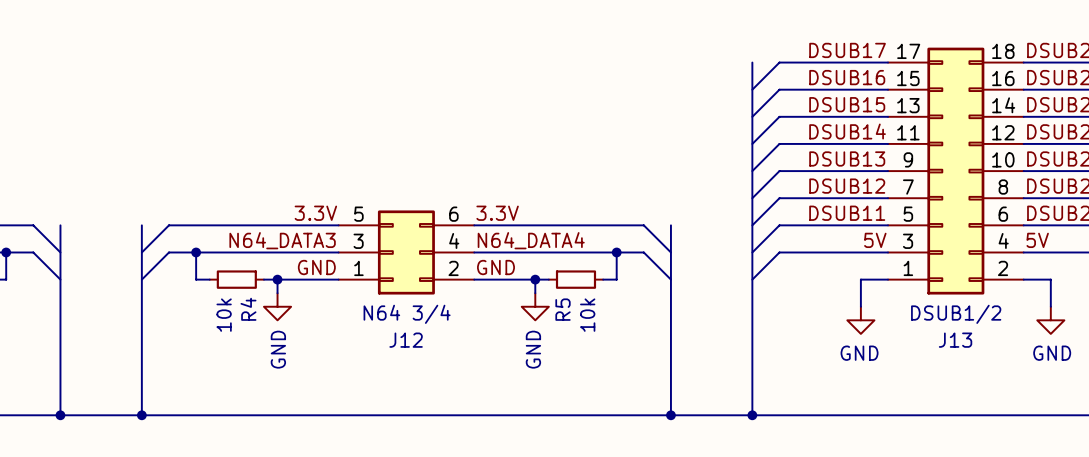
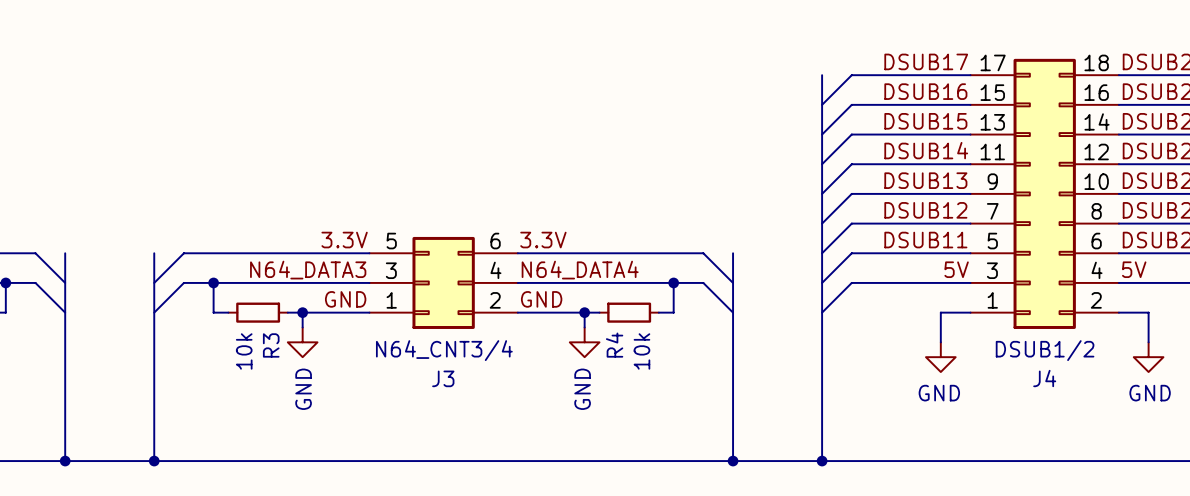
R4 name: R4 (248, 309) -> R3 (271, 345)
R5 name: R5 (563, 309) -> R4 (614, 345)
J12 value: N64 3/4 (407, 314) -> N64_CNT3/4 (444, 350)
J12 name: J12 (406, 340) -> J3 (443, 378)
J13 name: J13 (955, 340) -> J4 (1044, 378)

